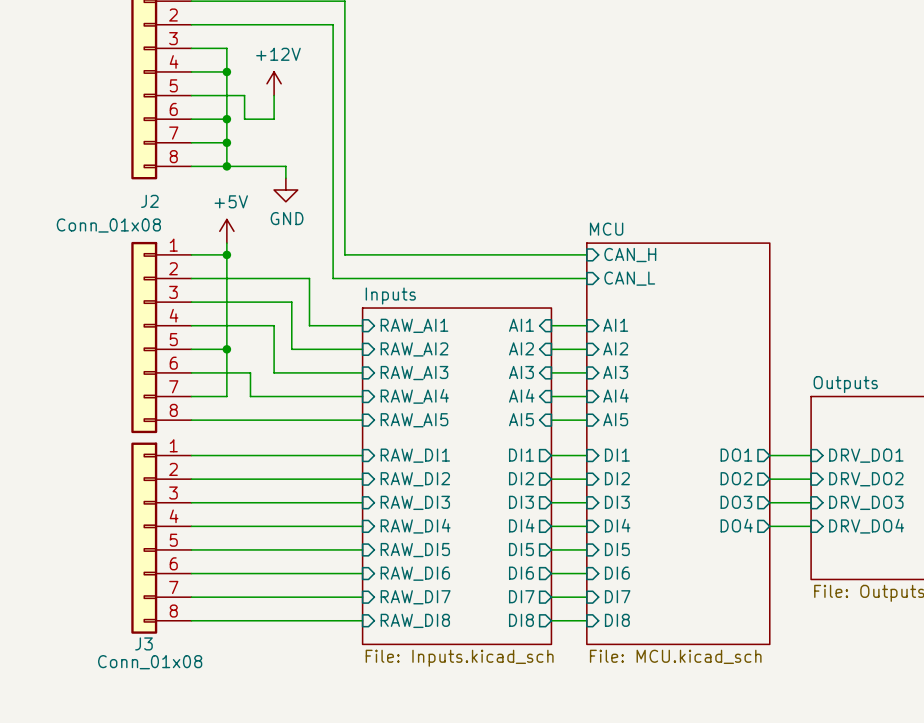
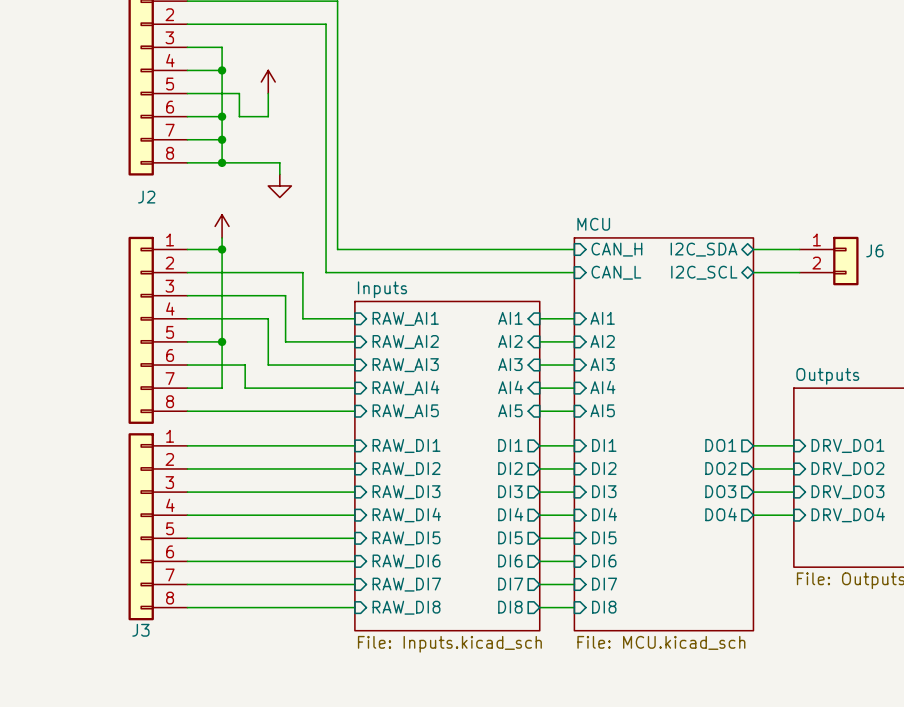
power symbol text: +12V (278, 54) -> none
power symbol text: +5V (231, 201) -> none
power symbol text: GND (287, 218) -> none
J2 value: Conn_01x08 (108, 225) -> none
wire: none -> (753, 249) (799, 249)
sheet pin: none -> I2C_SDA (704, 249)
J6: none -> (829, 261)
sheet pin: none -> I2C_SCL (704, 272)
wire: none -> (753, 272) (799, 272)
J3 value: Conn_01x08 (150, 662) -> none

